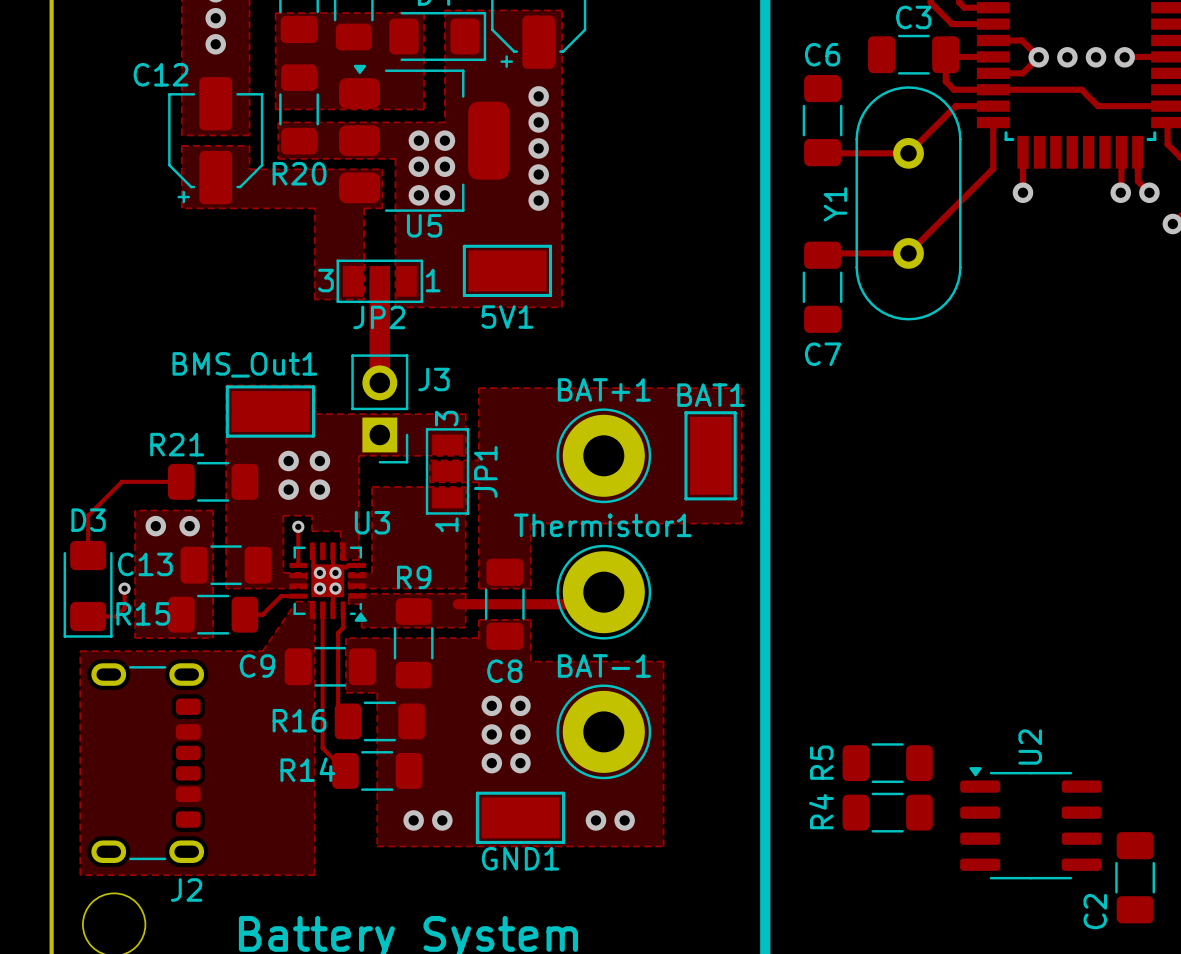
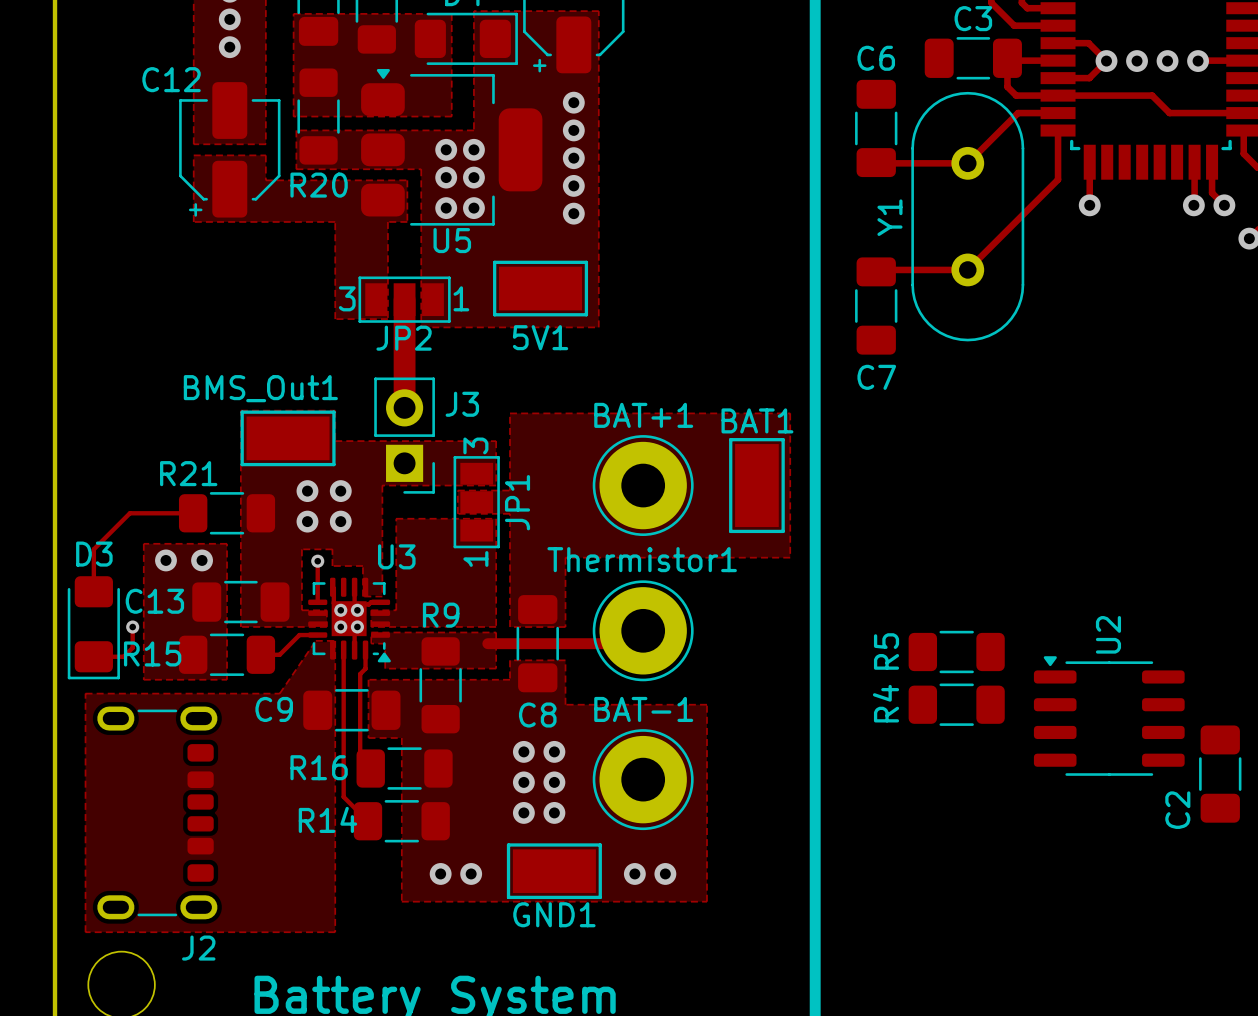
R5 position: (887, 763) -> (956, 652)
R4 position: (887, 812) -> (956, 704)
U2 position: (1030, 823) -> (1109, 716)
C2 position: (1135, 877) -> (1220, 774)

